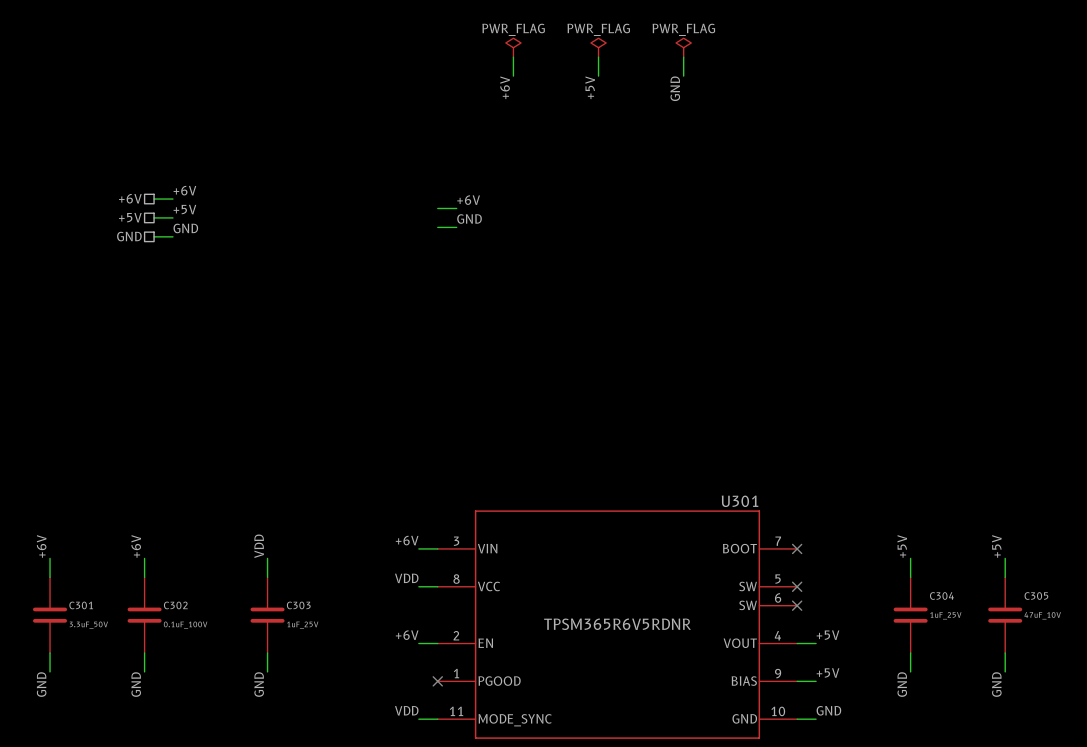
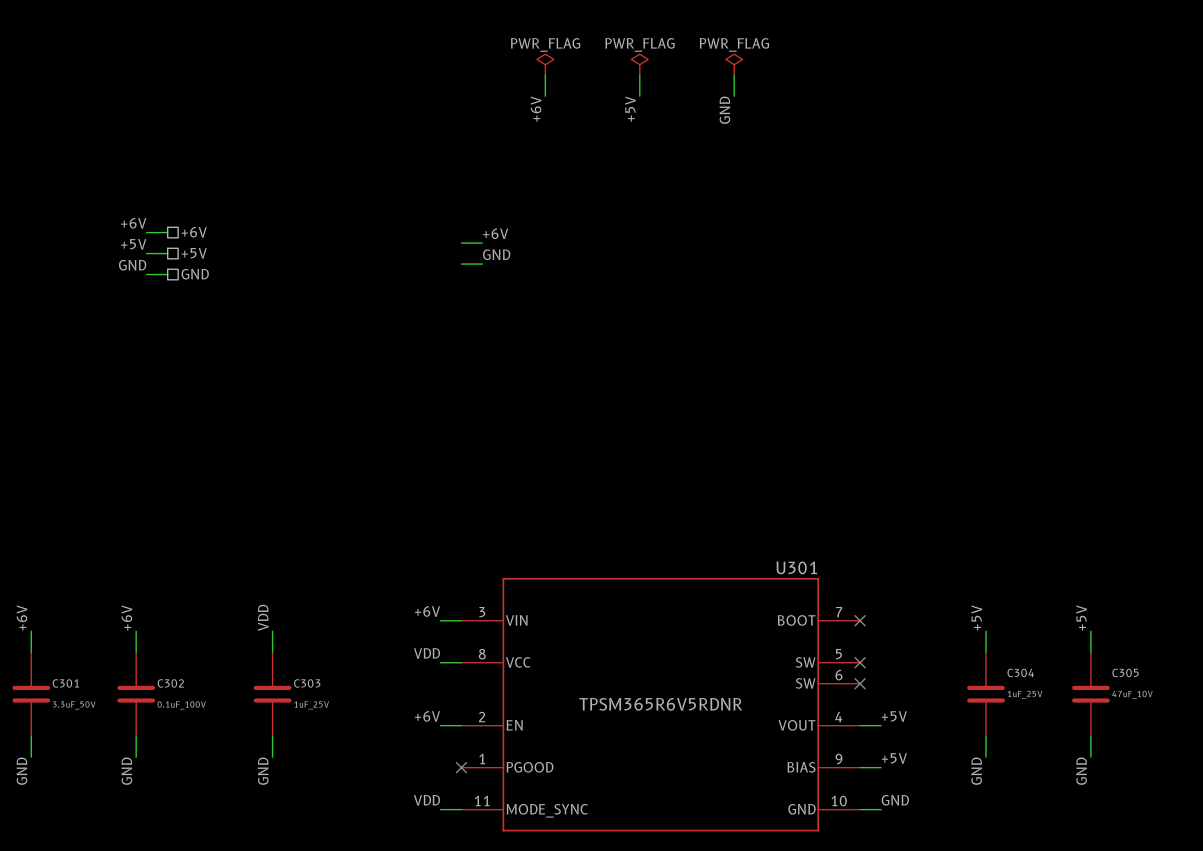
label position: +6V (184, 190) -> +6V (133, 223)
hierarchical label rotation: 0° (130, 198) -> 180° (194, 232)
hierarchical label position: +6V (130, 198) -> +6V (194, 232)
label position: +5V (184, 209) -> +5V (133, 244)
hierarchical label rotation: 0° (130, 217) -> 180° (194, 253)
hierarchical label position: +5V (130, 217) -> +5V (194, 253)
label position: GND (185, 228) -> GND (132, 265)
hierarchical label rotation: 0° (129, 236) -> 180° (195, 274)
hierarchical label position: GND (129, 236) -> GND (195, 274)

